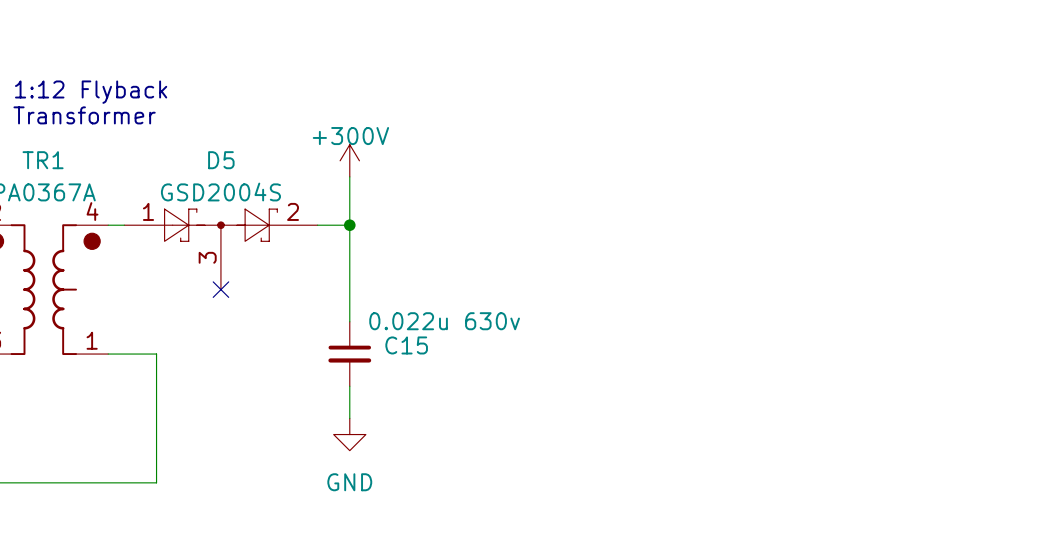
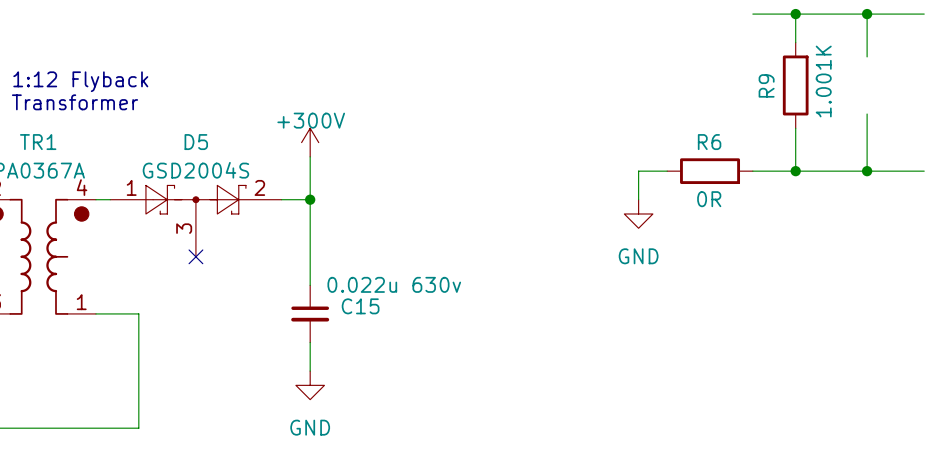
wire: none -> (752, 14) (924, 14)
wire: none -> (795, 14) (795, 42)
junction: none -> (795, 14)
wire: none -> (867, 14) (867, 56)
junction: none -> (867, 14)
R9: none -> 1.001K (795, 85)
wire: none -> (867, 114) (867, 171)
wire: none -> (795, 128) (795, 171)
wire: none -> (667, 171) (638, 171) (638, 199)
R6: none -> 0R (710, 171)
wire: none -> (752, 171) (924, 171)
junction: none -> (795, 171)
junction: none -> (867, 171)
power symbol: none -> GND (638, 213)

